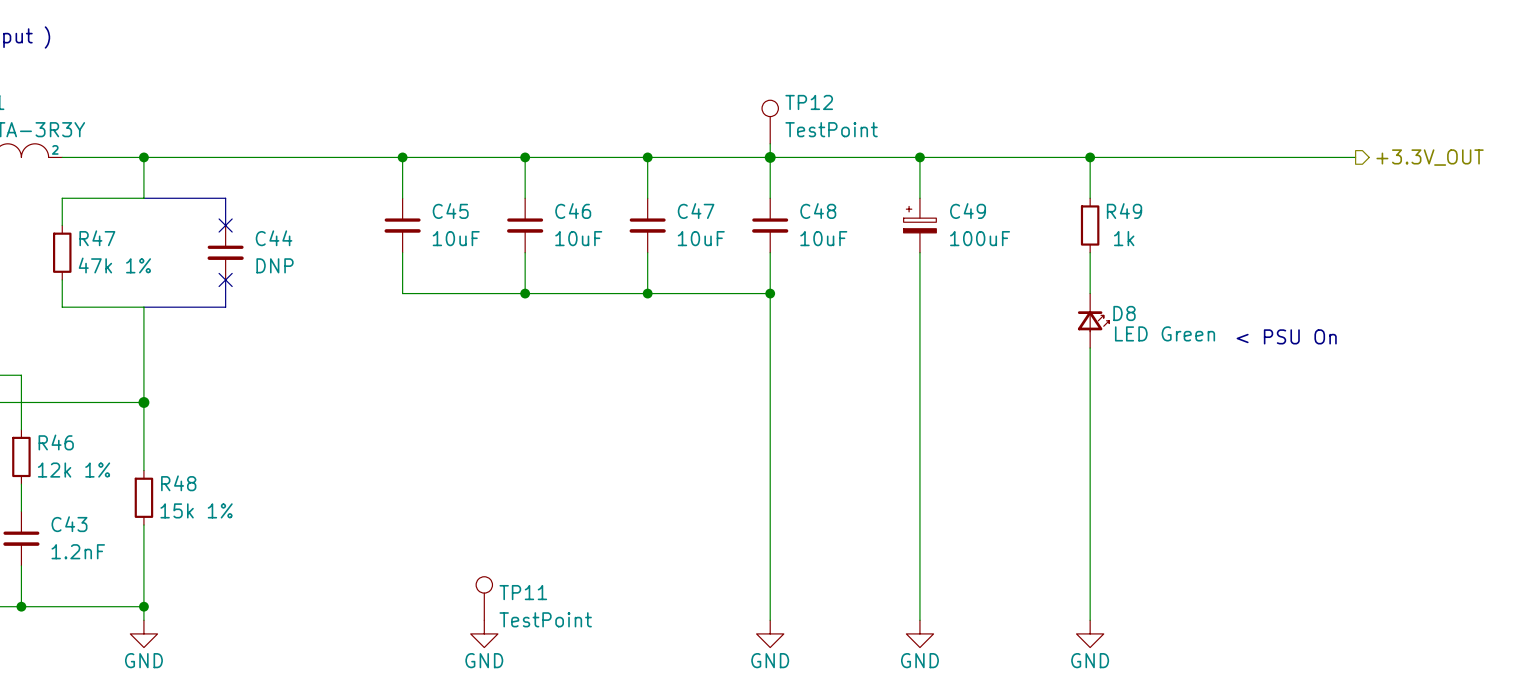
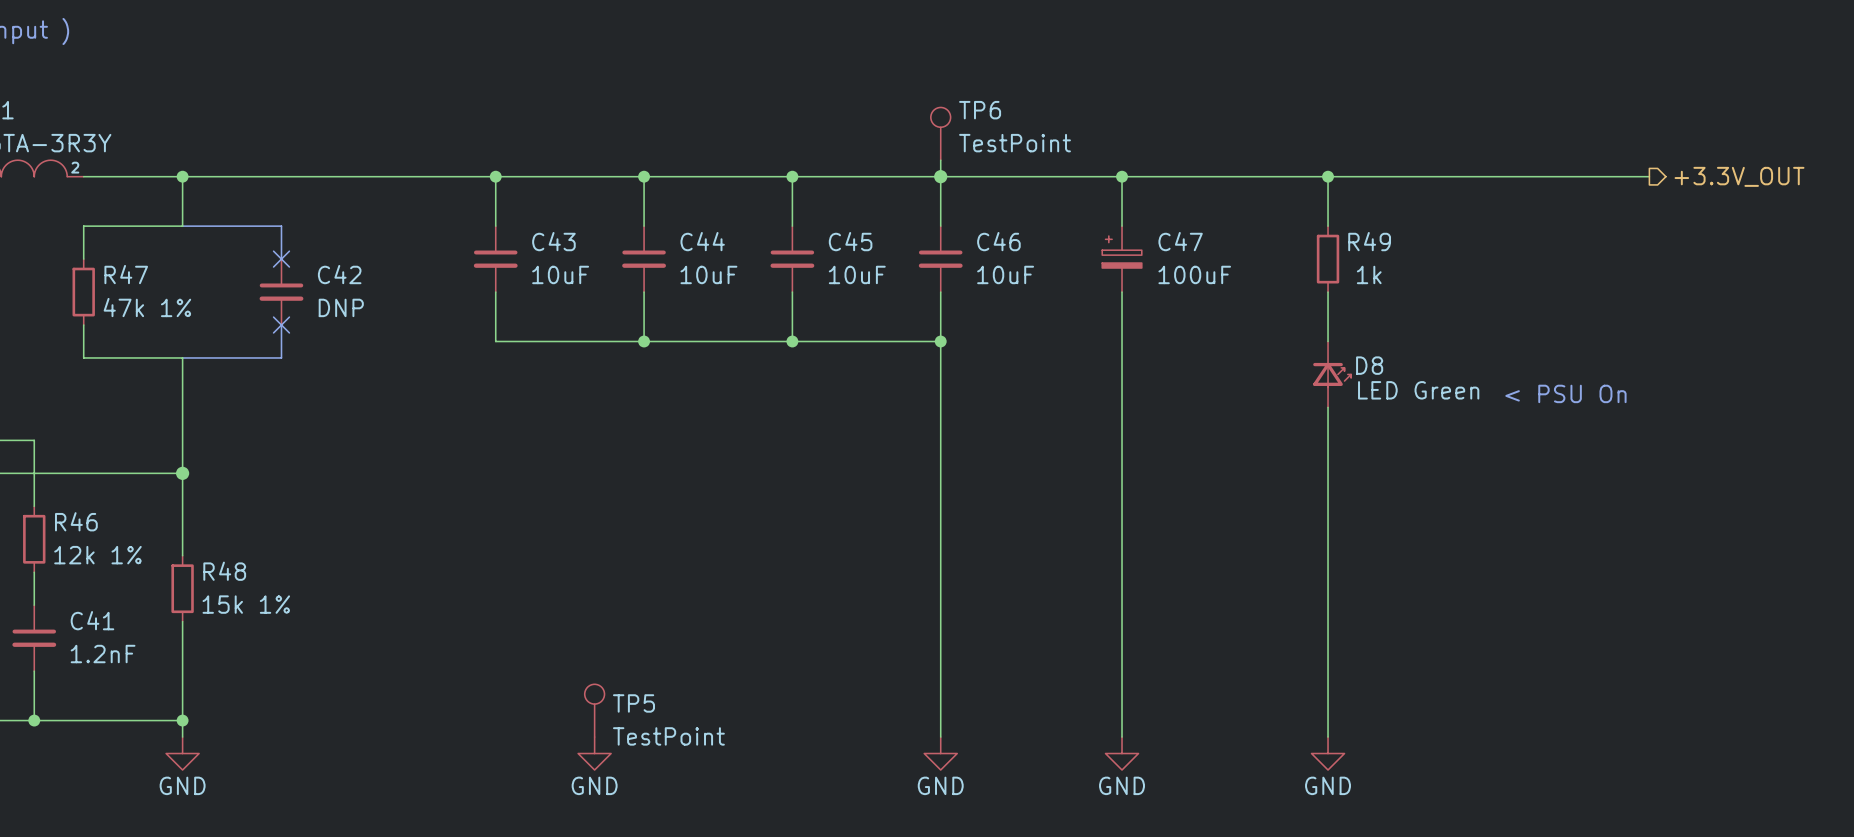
TP12 name: TP12 (809, 102) -> TP6 (980, 110)
C45 name: C45 (450, 211) -> C43 (553, 241)
C46 name: C46 (573, 211) -> C44 (702, 241)
C47 name: C47 (696, 211) -> C45 (850, 241)
C48 name: C48 (818, 211) -> C46 (998, 241)
C49 name: C49 (968, 211) -> C47 (1180, 241)
C44 name: C44 (274, 238) -> C42 (339, 274)
C43 name: C43 (69, 524) -> C41 (92, 620)
TP11 name: TP11 (523, 592) -> TP5 (633, 703)

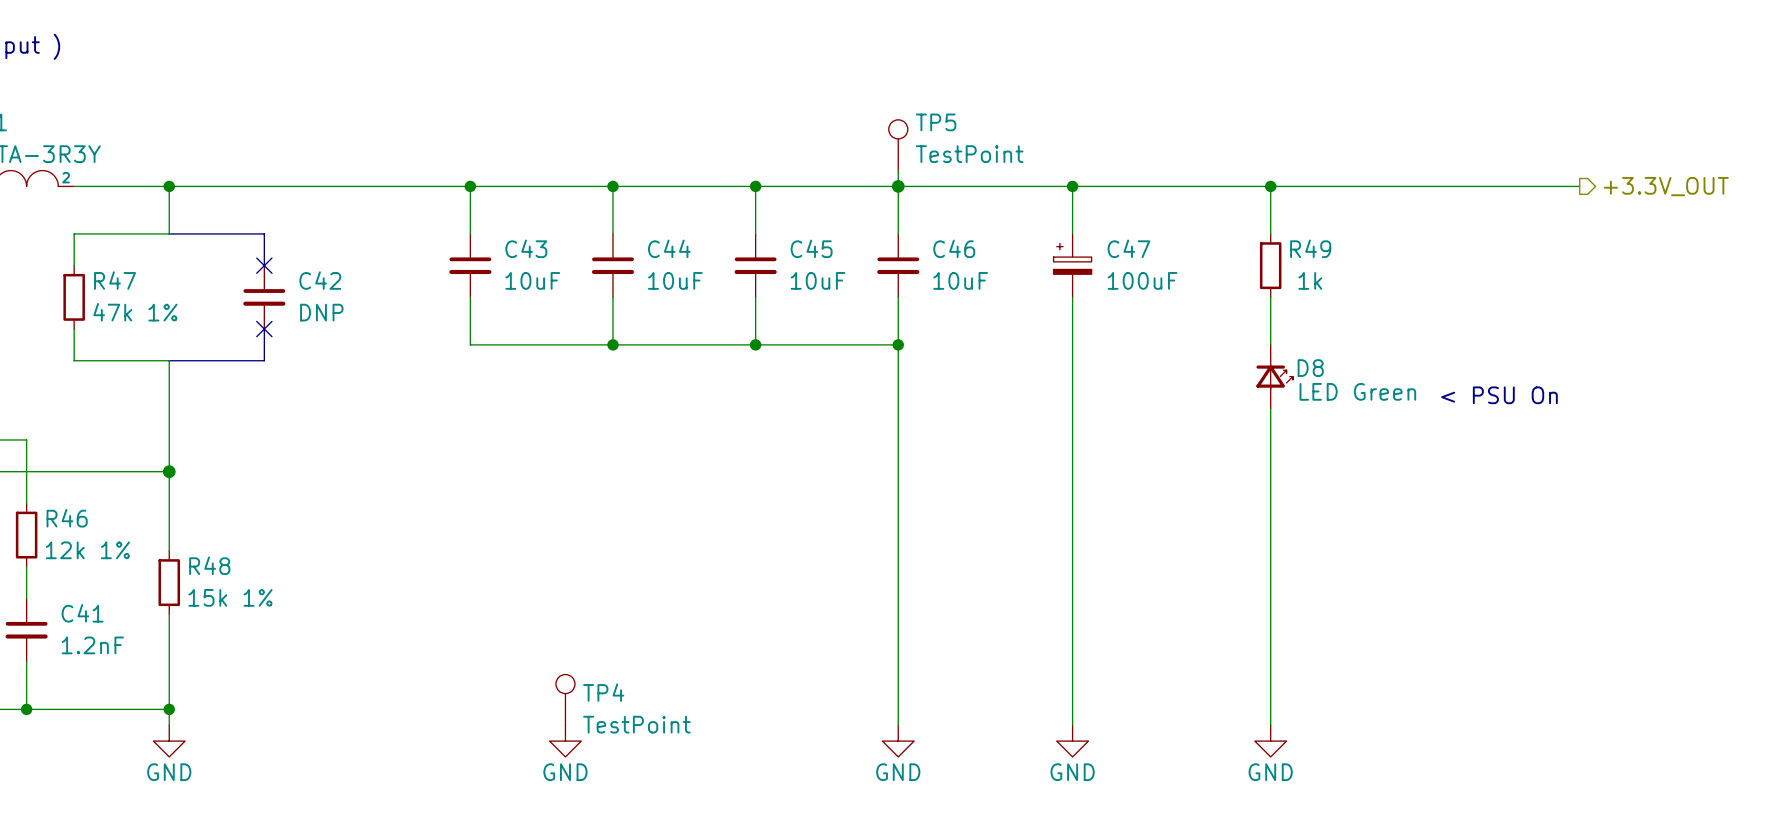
TP6 name: TP6 (980, 110) -> TP5 (936, 122)
TP5 name: TP5 (633, 703) -> TP4 (603, 692)

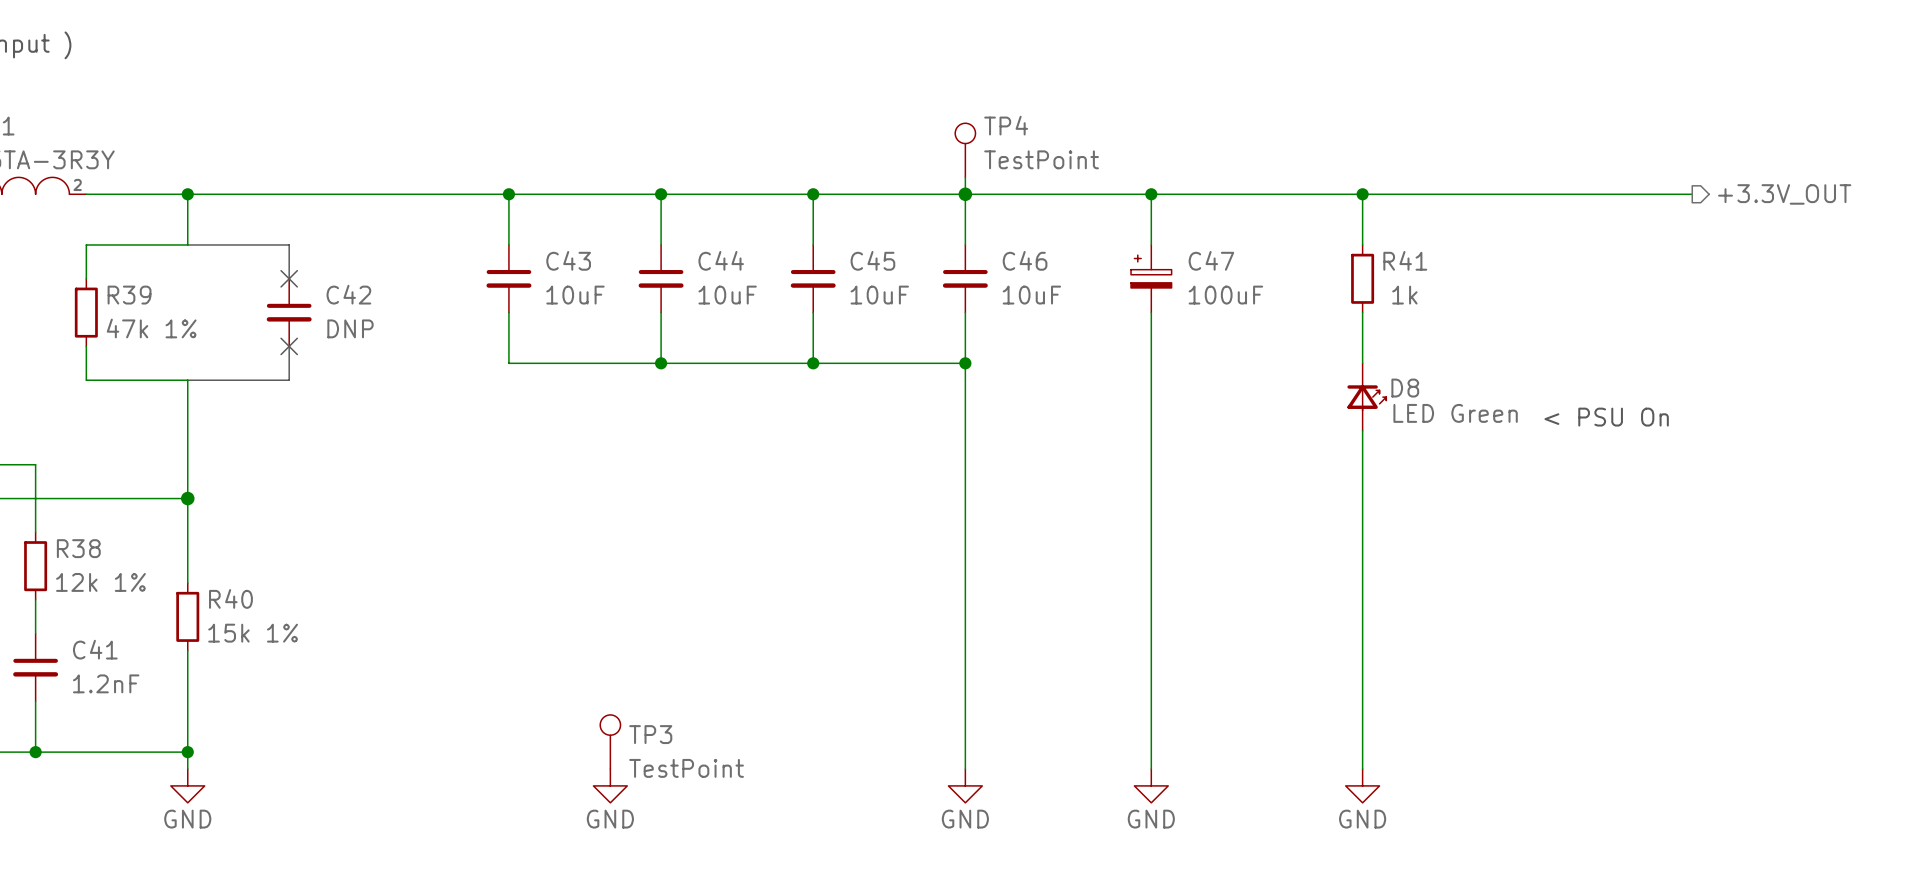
TP5 name: TP5 (936, 122) -> TP4 (1006, 125)
R49 name: R49 (1310, 248) -> R41 (1405, 260)
R47 name: R47 (115, 280) -> R39 (129, 295)
R46 name: R46 (67, 518) -> R38 (78, 548)
R48 name: R48 (209, 565) -> R40 (230, 598)
TP4 name: TP4 (603, 692) -> TP3 (650, 734)

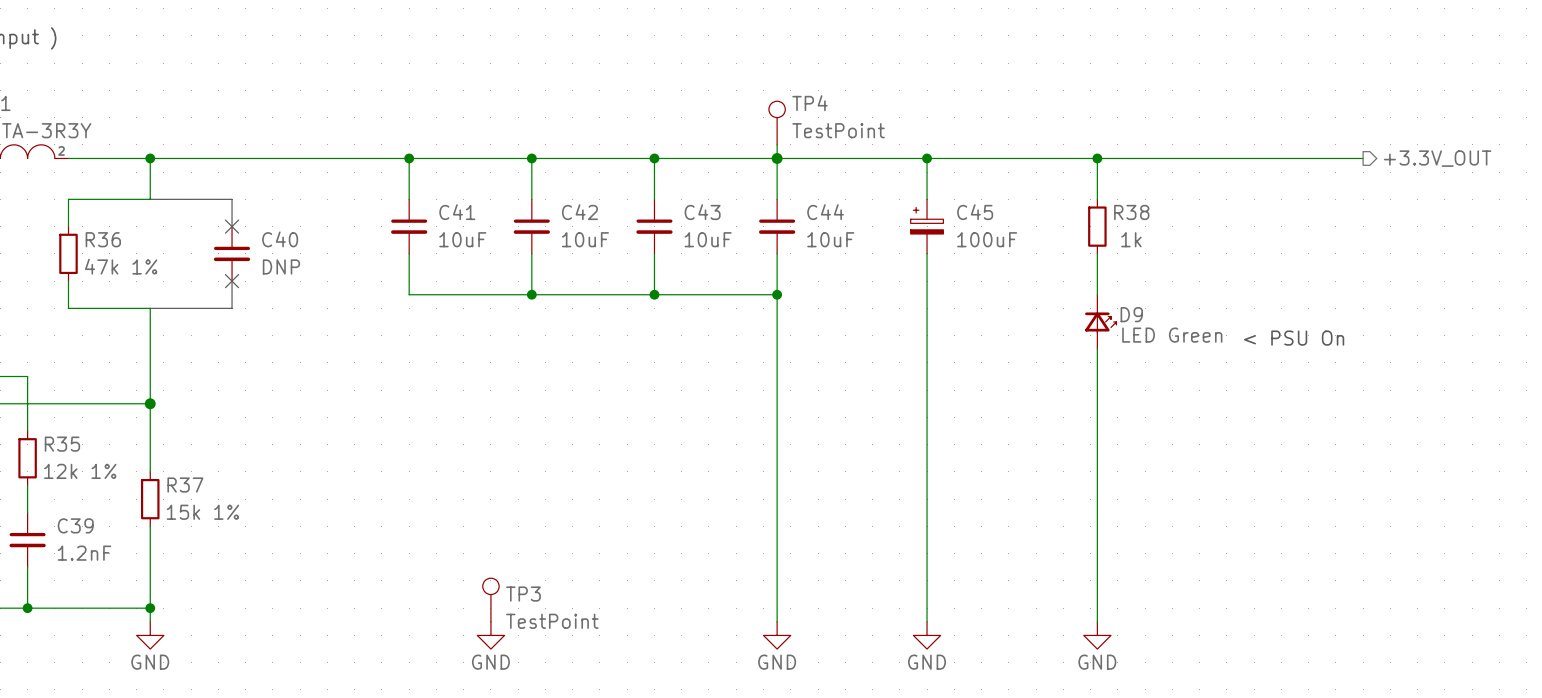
C43 name: C43 (568, 260) -> C41 (457, 212)
C44 name: C44 (721, 260) -> C42 (579, 212)
C45 name: C45 (872, 260) -> C43 (702, 212)
C46 name: C46 (1025, 260) -> C44 (825, 212)
C47 name: C47 (1211, 260) -> C45 (975, 212)
R41 name: R41 (1405, 260) -> R38 (1131, 212)
C42 name: C42 (348, 294) -> C40 (280, 239)
R39 name: R39 (129, 295) -> R36 (103, 239)
D8 name: D8 (1405, 388) -> D9 (1131, 314)
R38 name: R38 (78, 548) -> R35 (62, 444)
R40 name: R40 (230, 598) -> R37 (185, 485)
C41 name: C41 (95, 649) -> C39 (75, 525)

